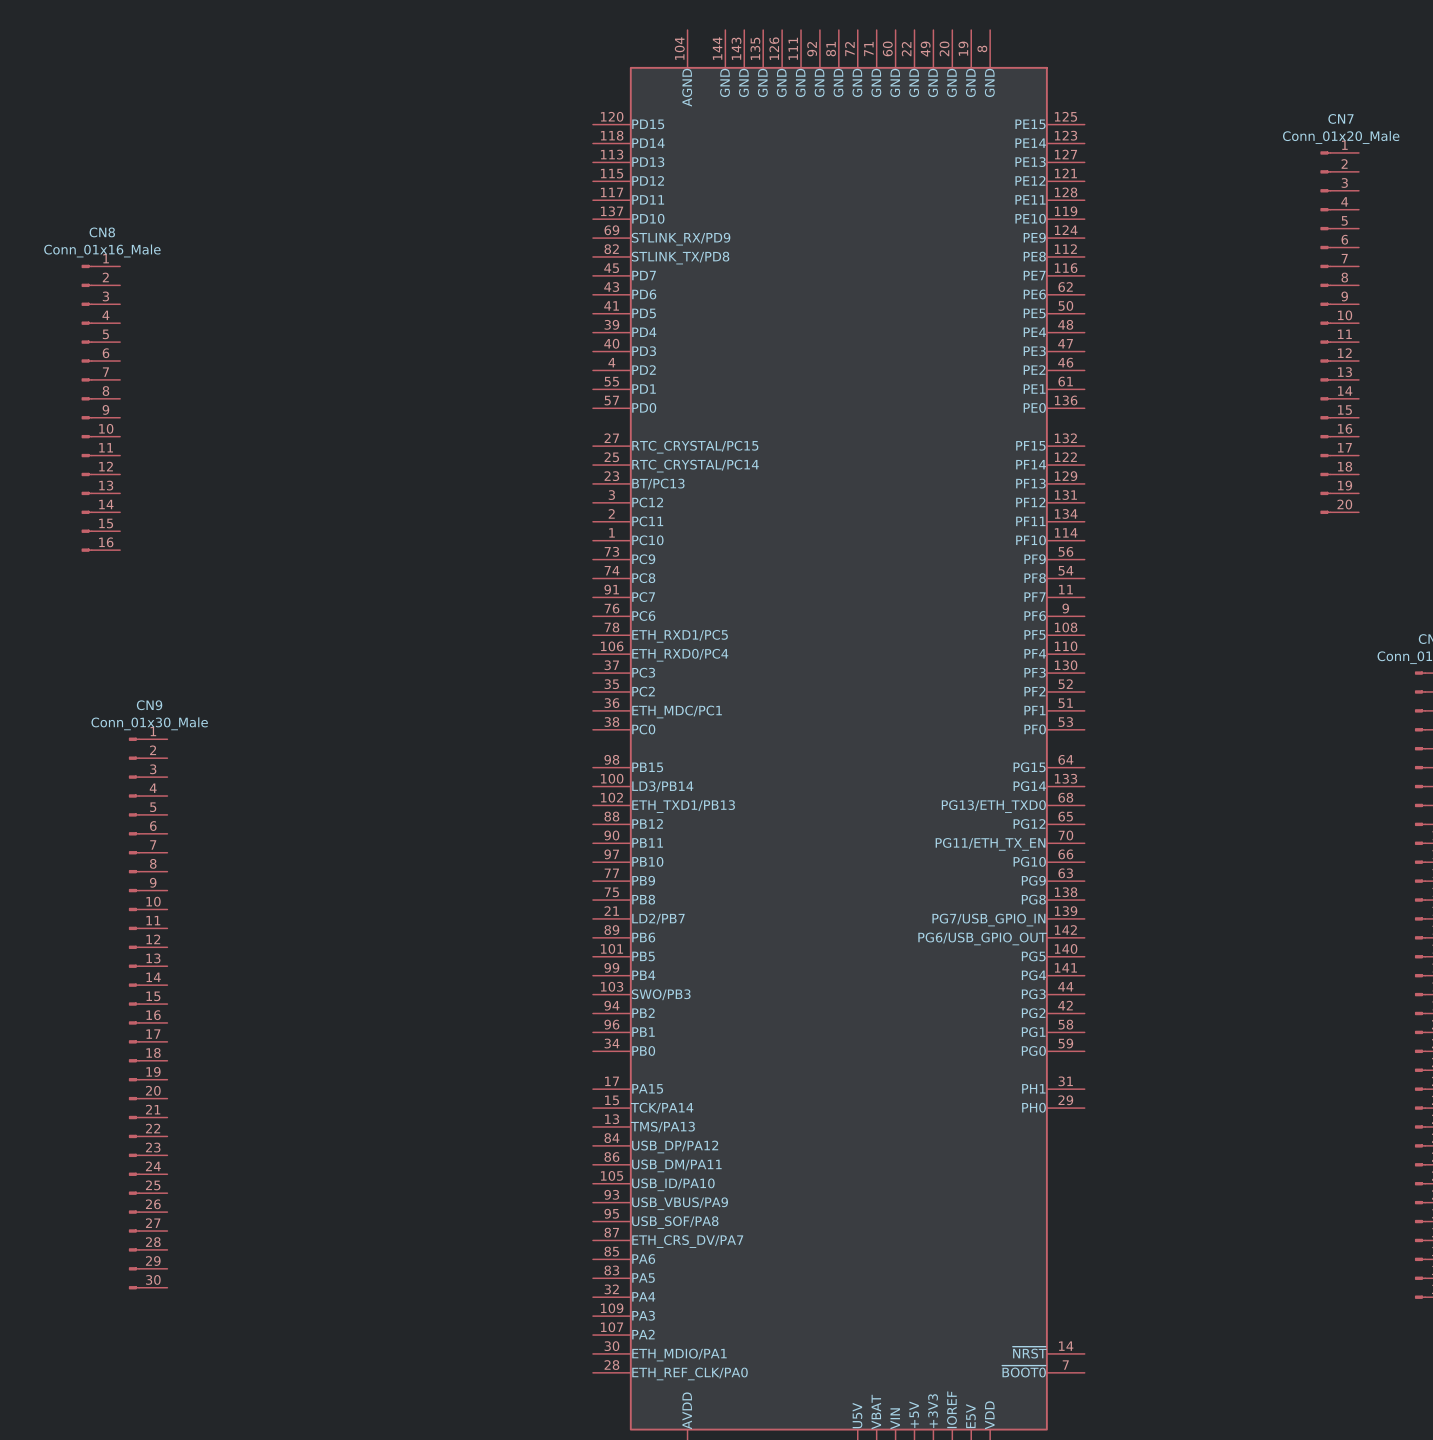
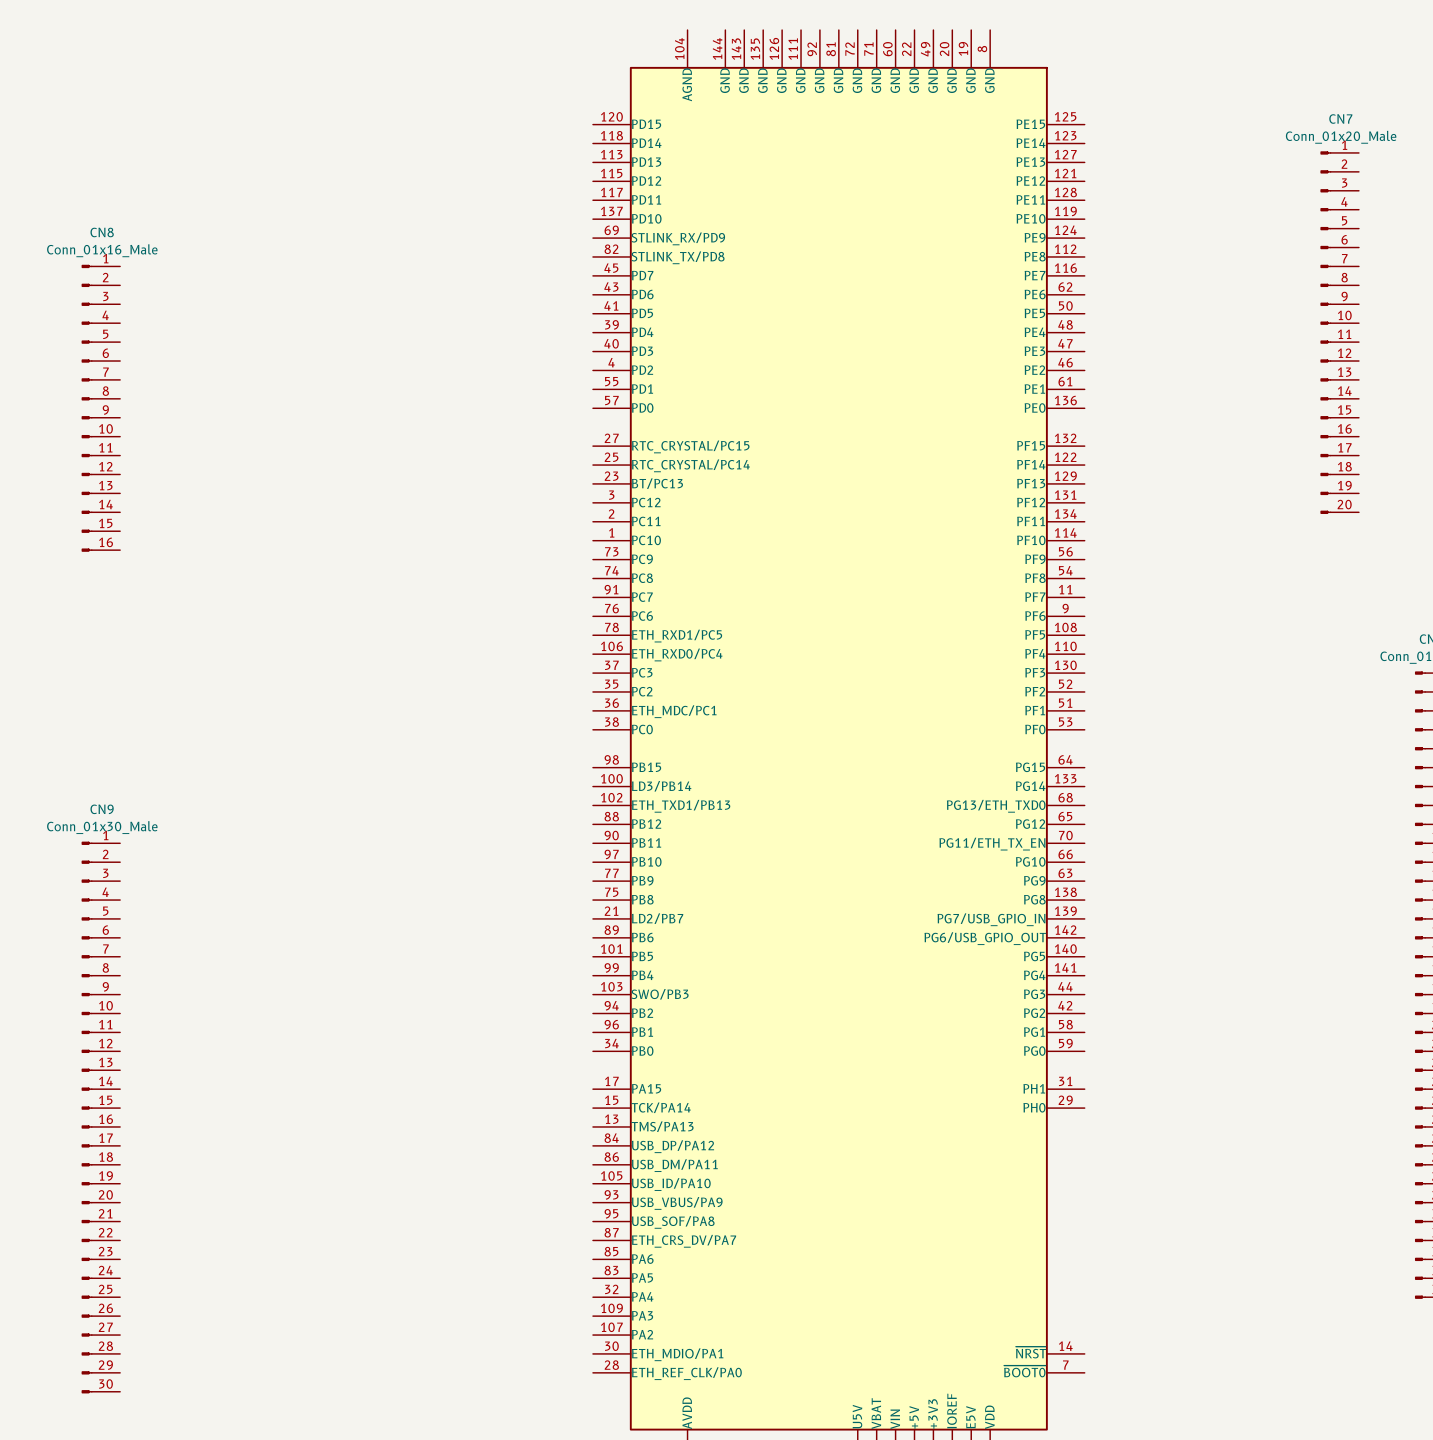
CN9 position: (148, 1013) -> (100, 1117)

